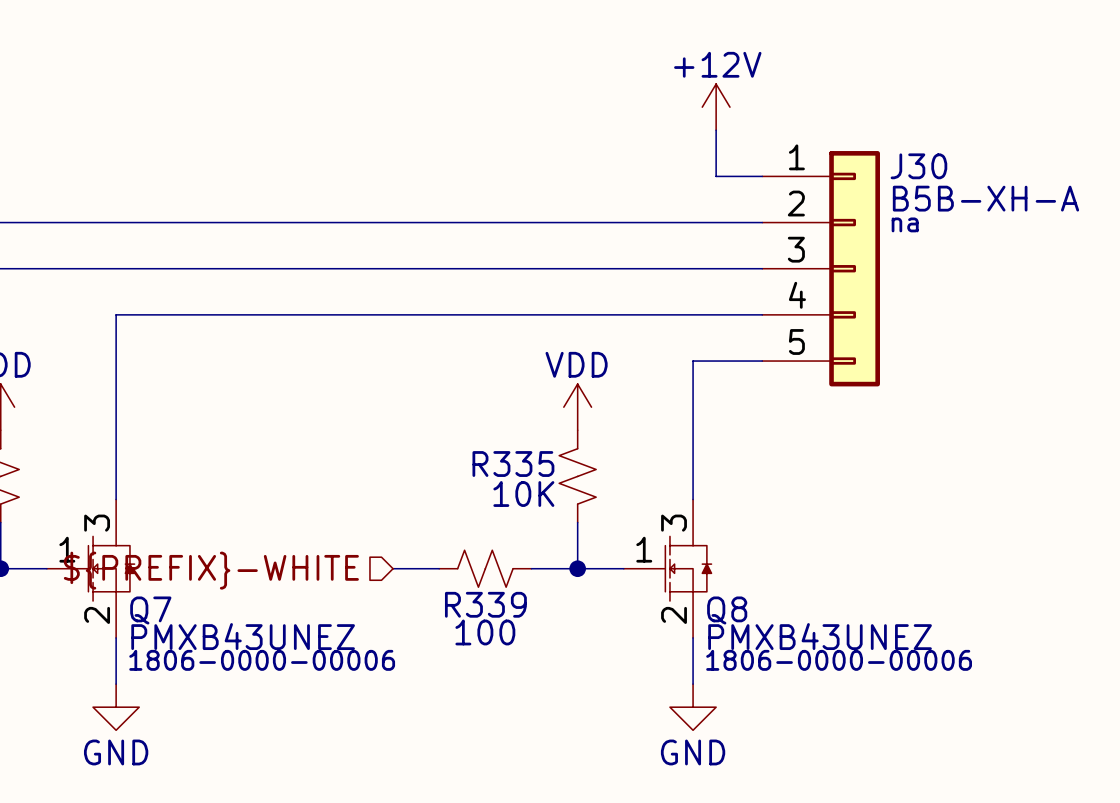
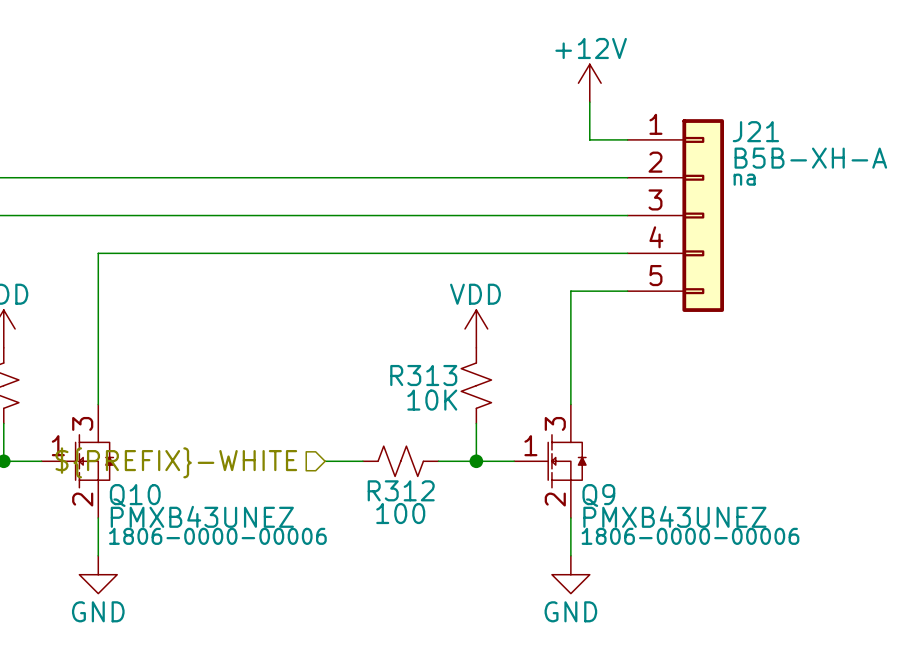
J30 name: J30 (918, 166) -> J21 (755, 131)
R335 name: R335 (513, 464) -> R313 (423, 375)
R339 name: R339 (485, 604) -> R312 (401, 490)
Q7 name: Q7 (150, 610) -> Q10 (135, 495)
Q8 name: Q8 (727, 610) -> Q9 (598, 495)

